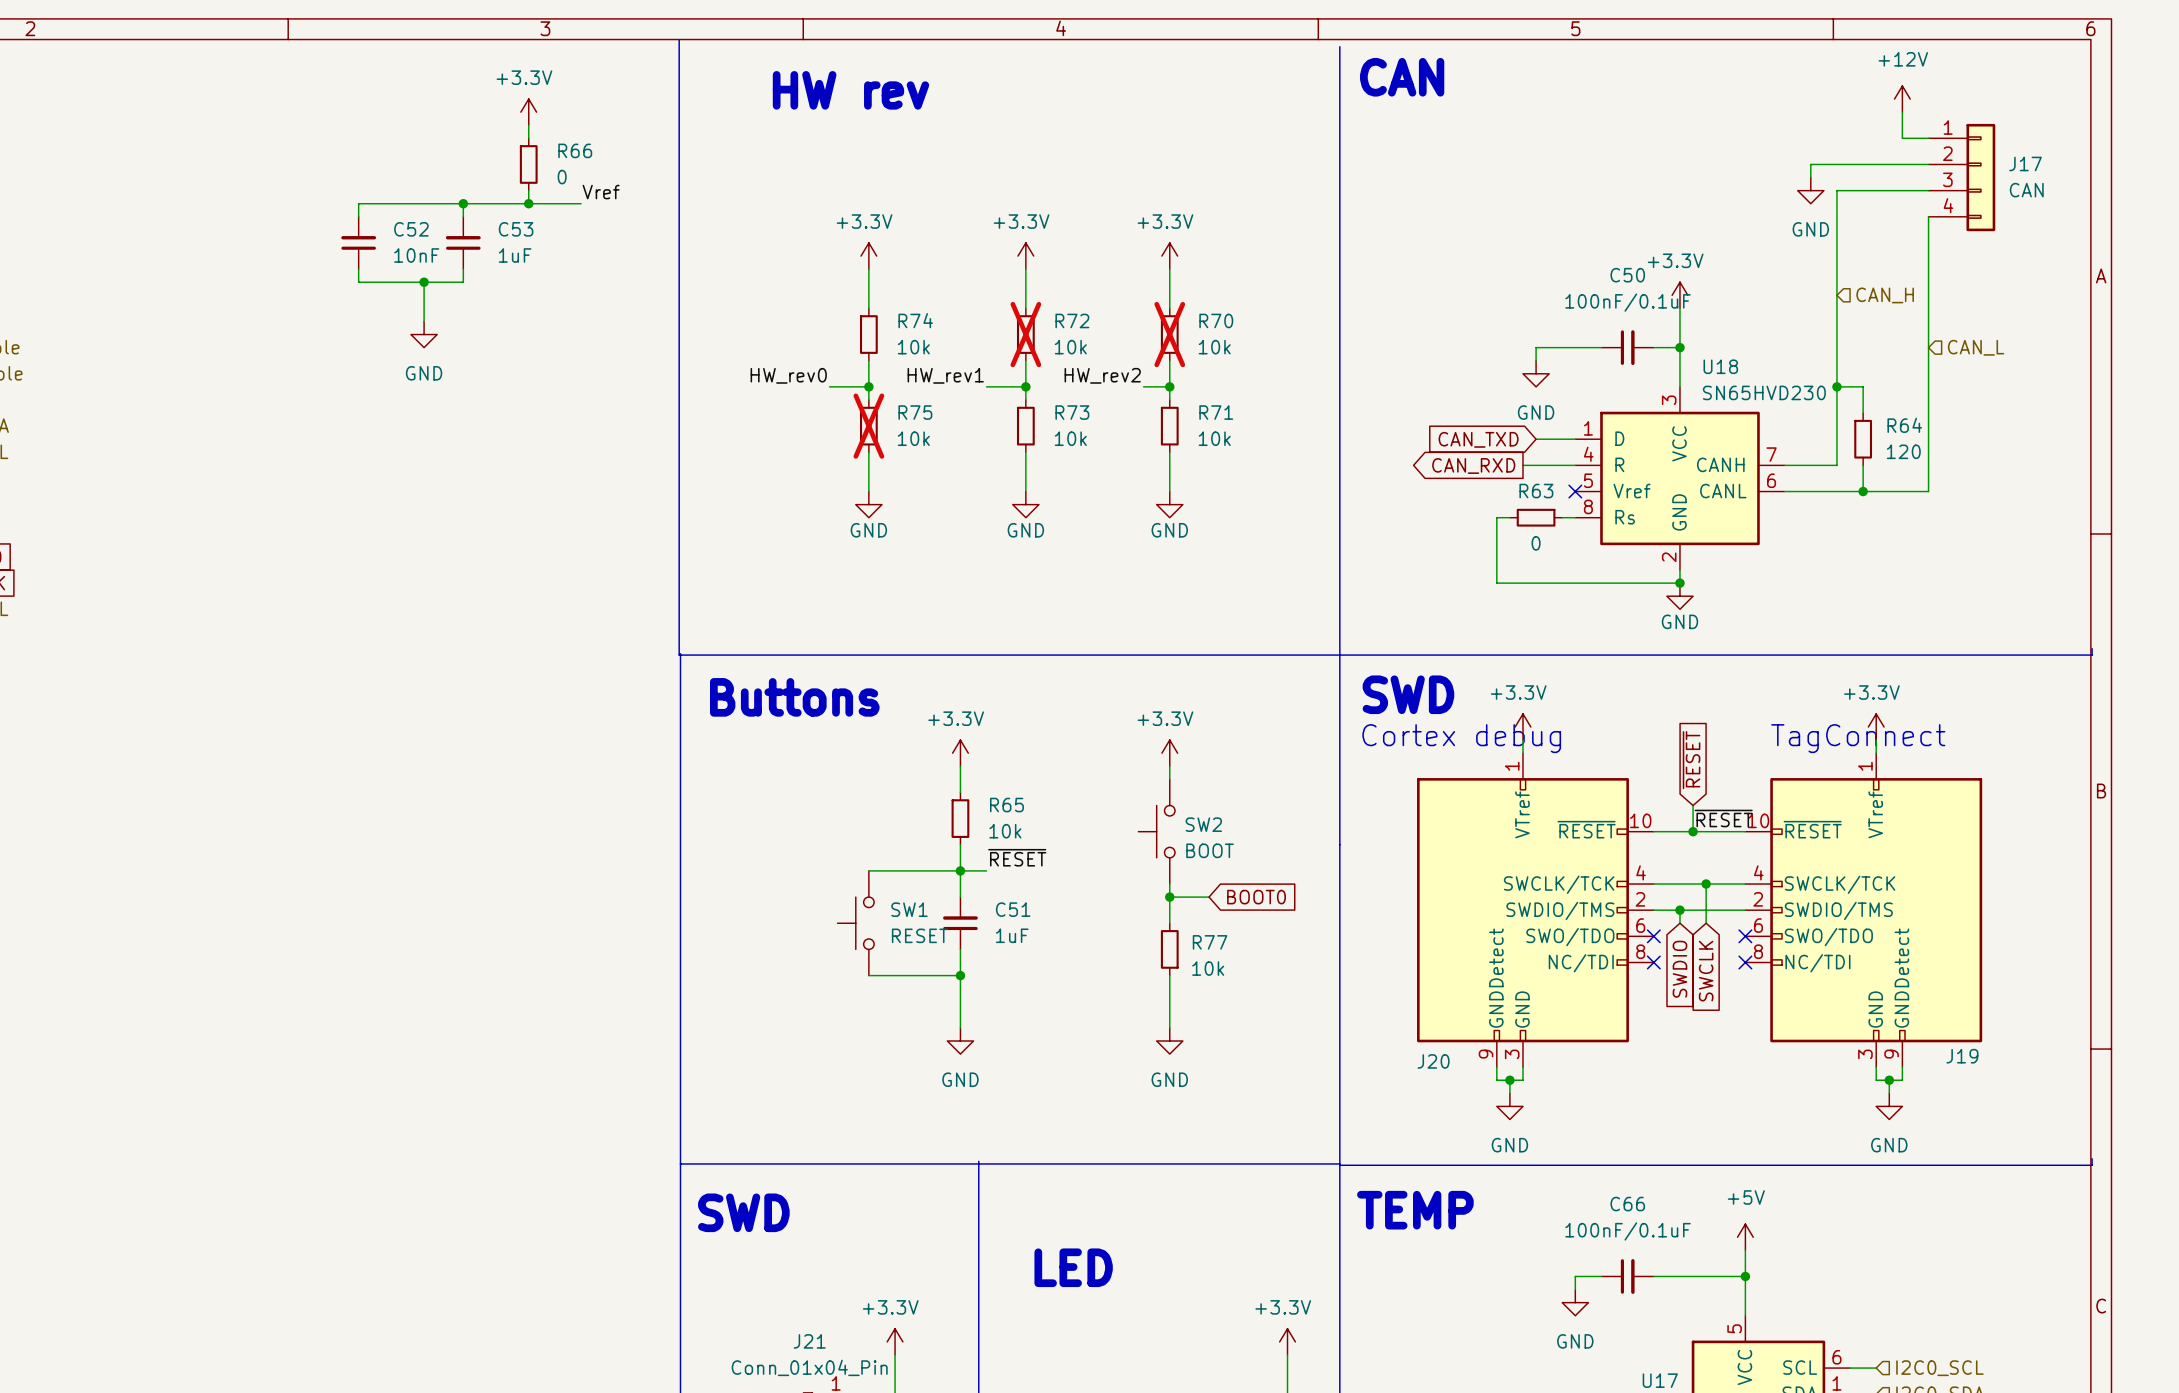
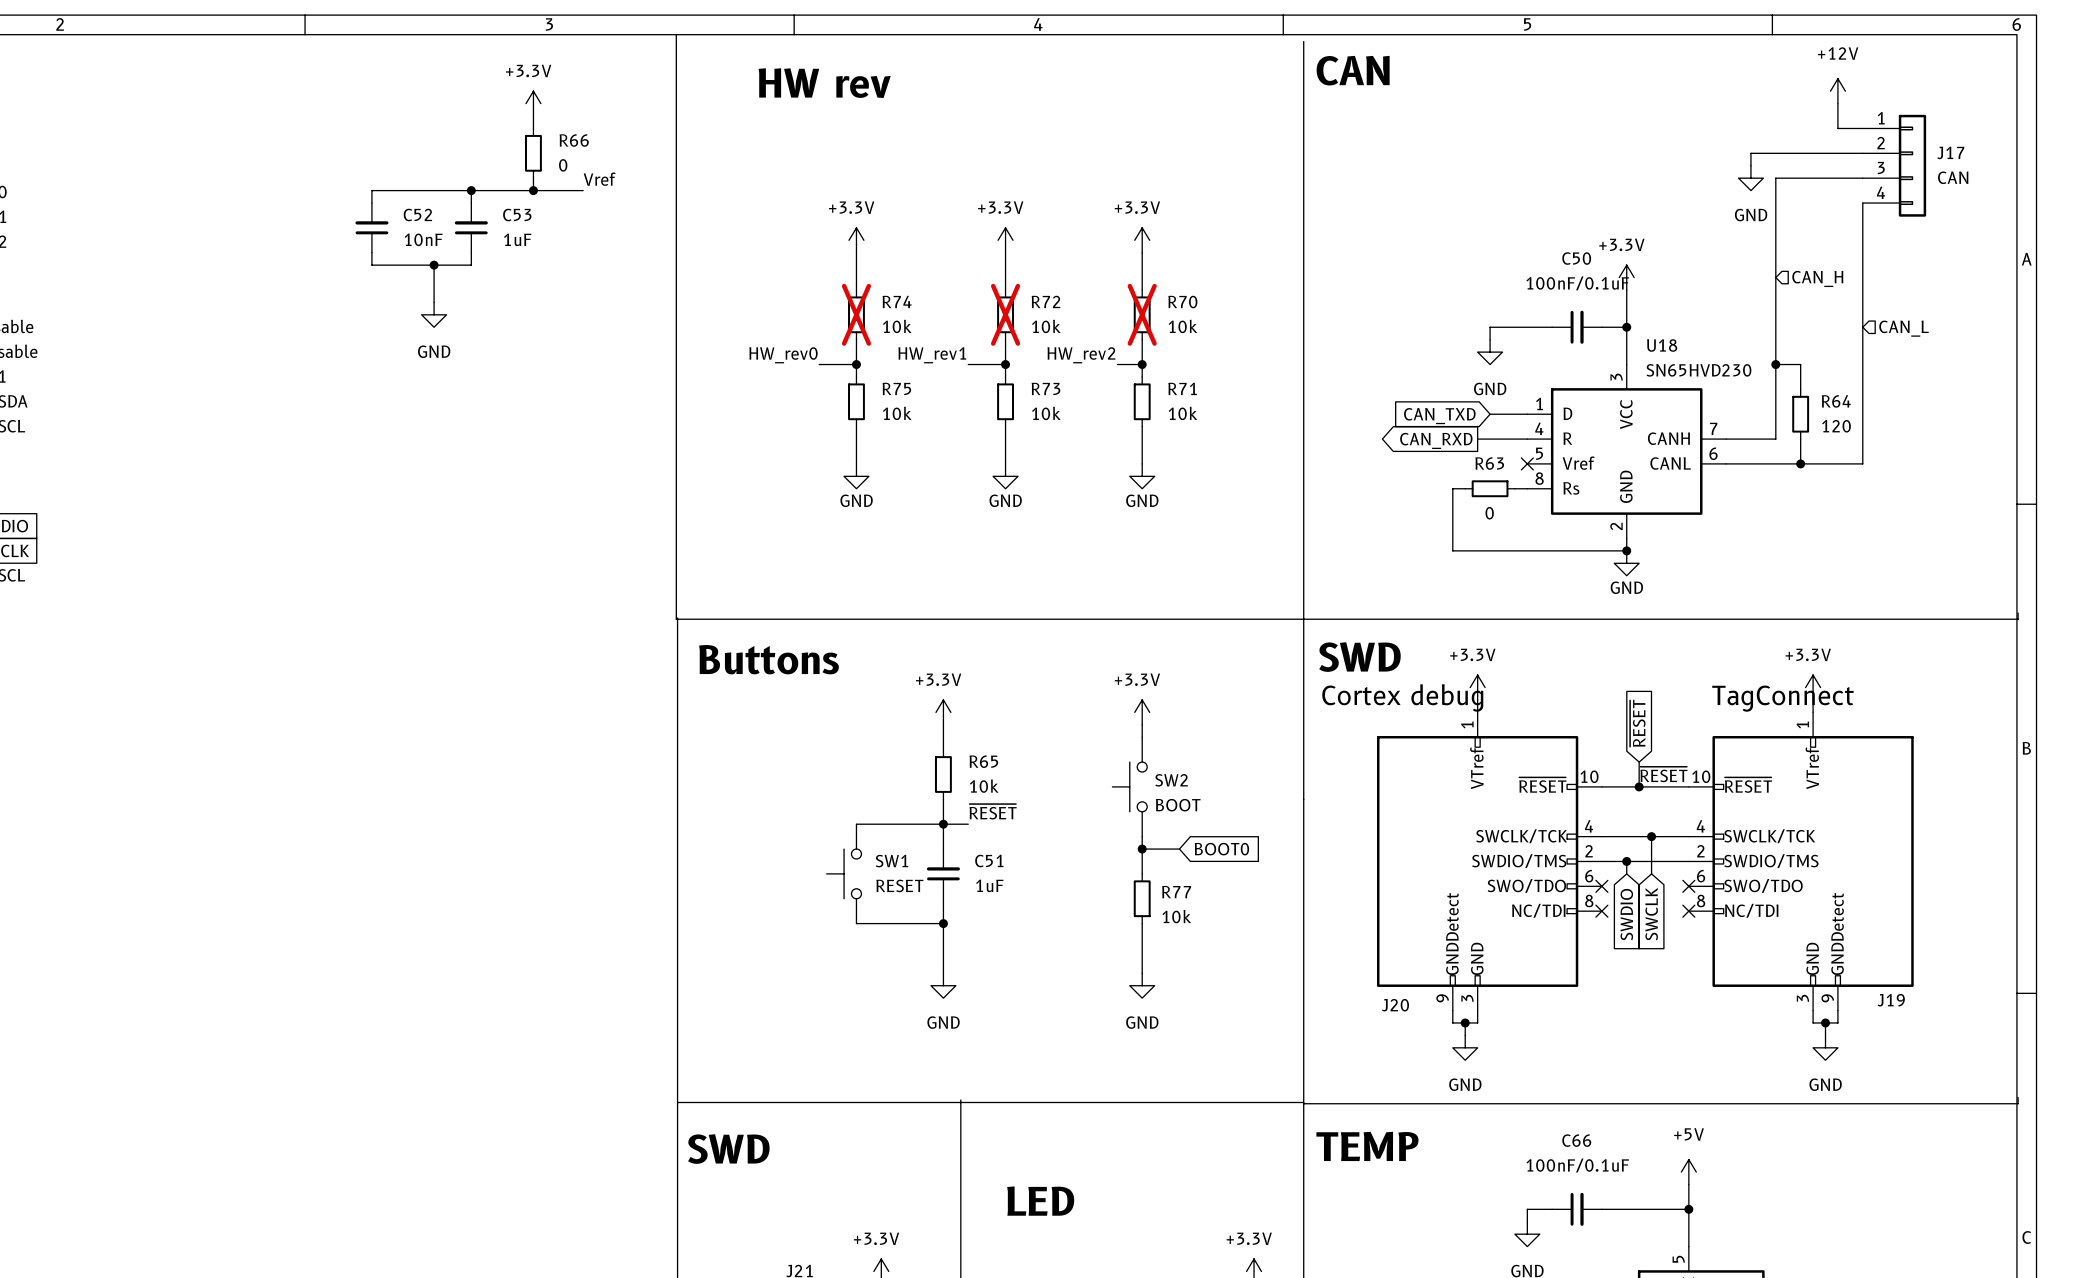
R74 do-not-place cross: none -> (856, 314)
R75 do-not-place cross: (868, 426) -> none

